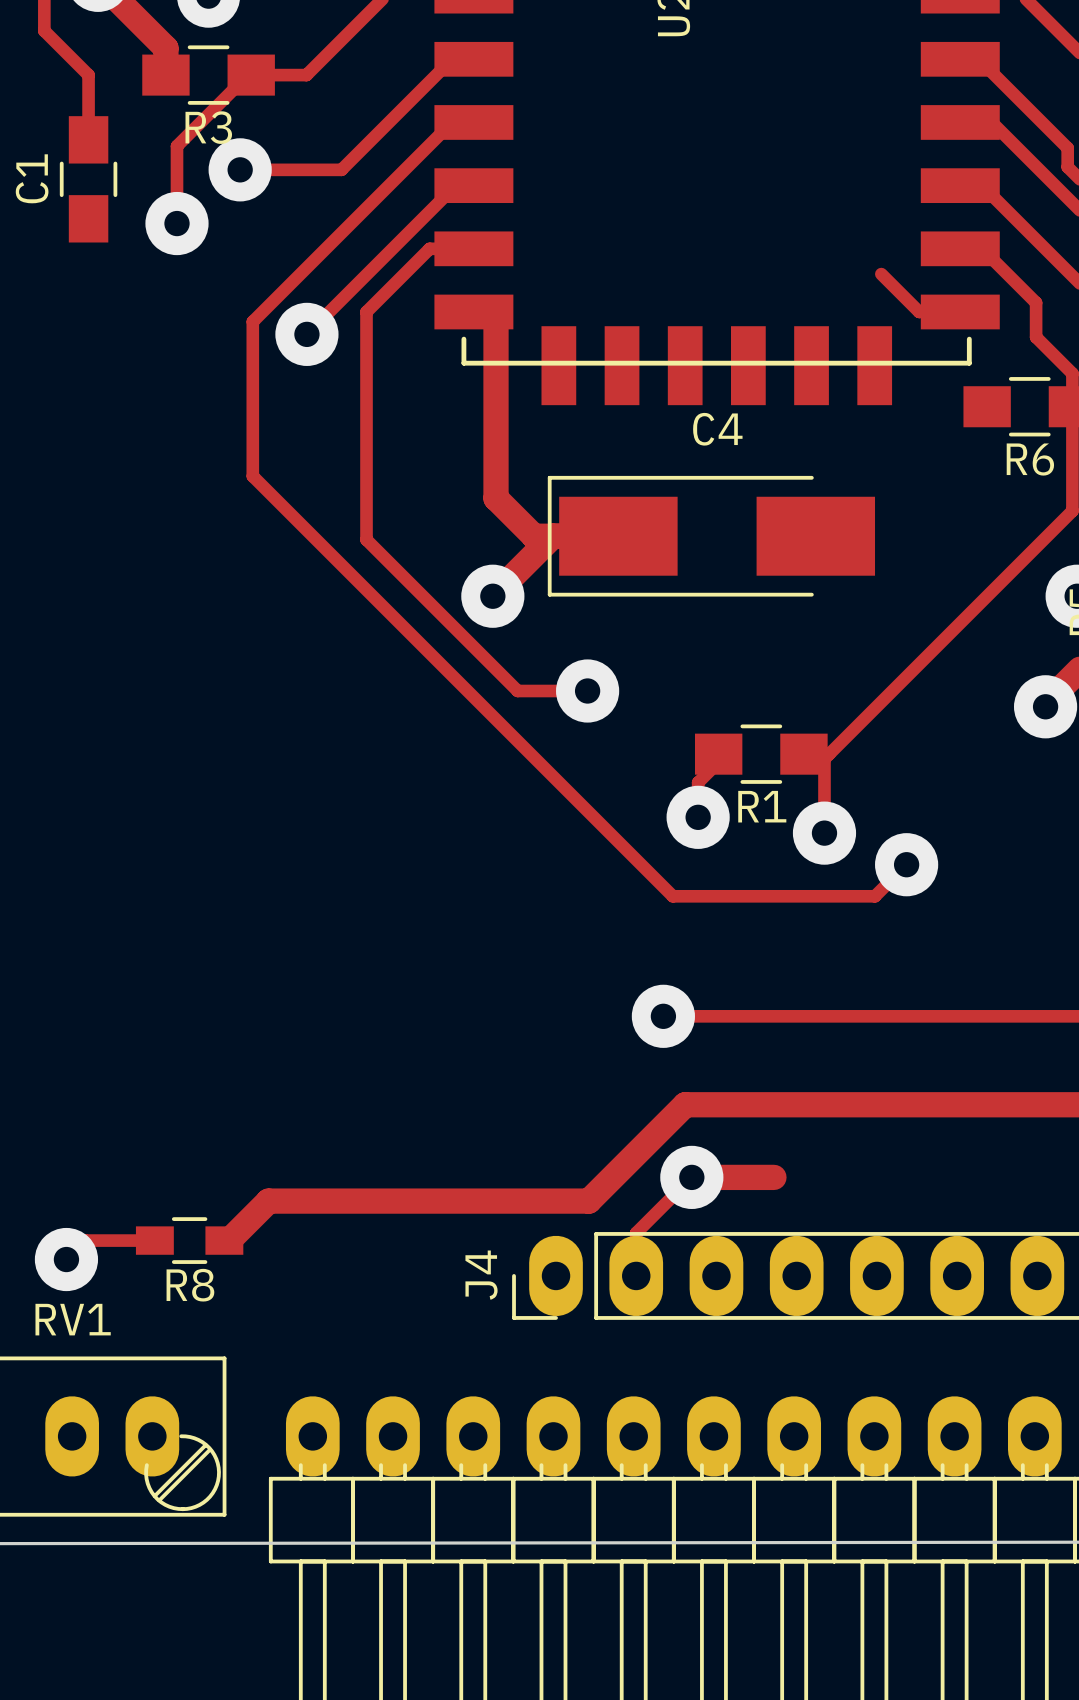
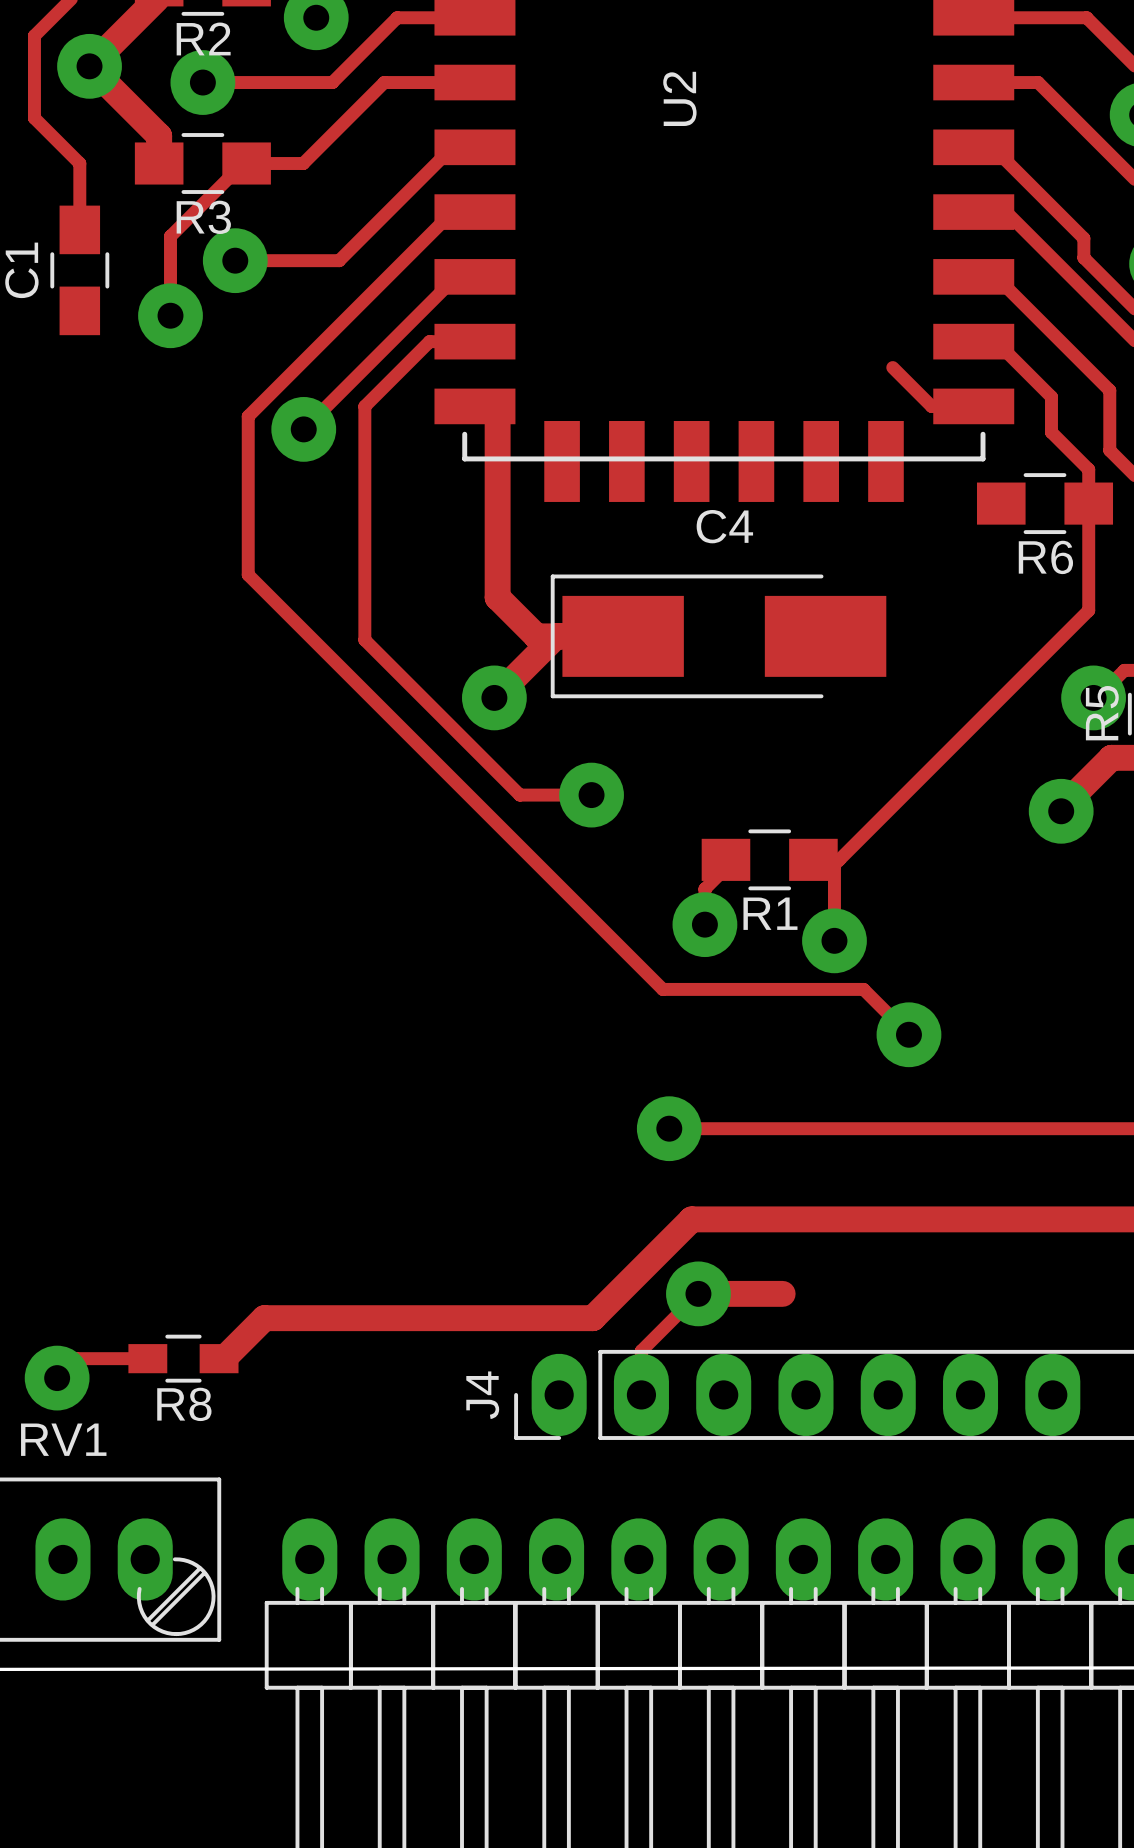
track: (906, 864) (875, 896) (672, 896) (657, 880) -> (908, 1034) (863, 989) (662, 989)
via position: (906, 864) -> (908, 1034)

